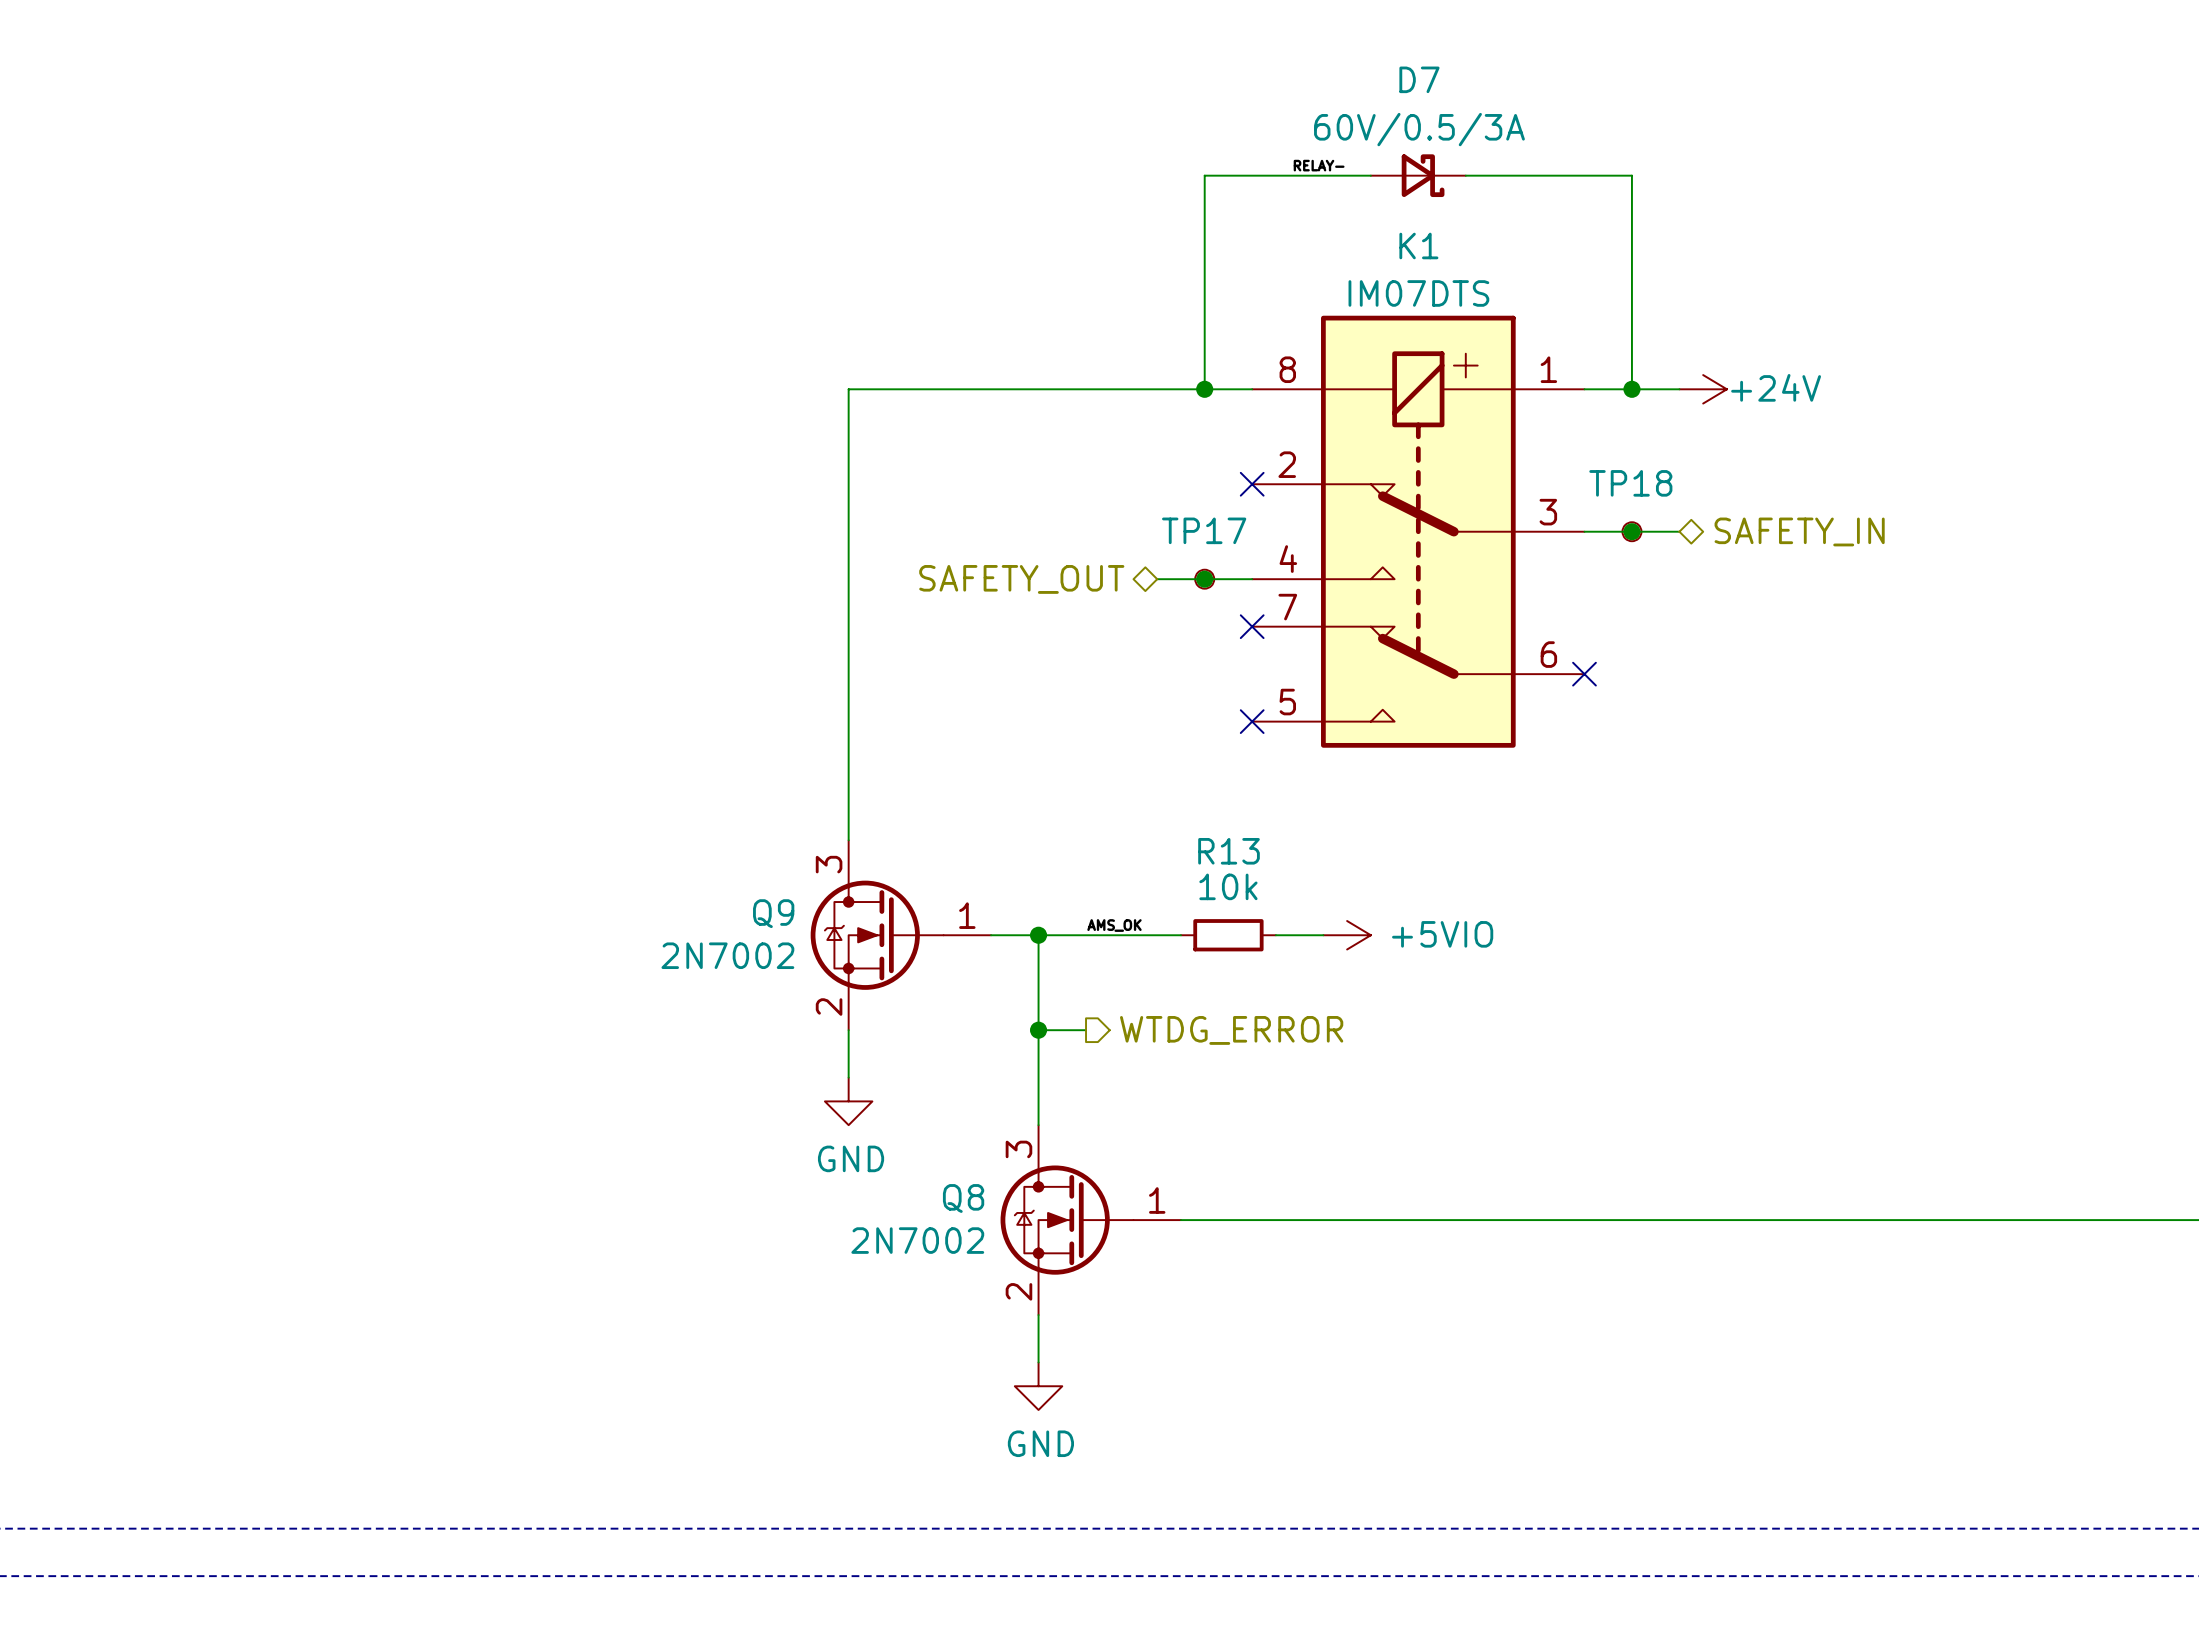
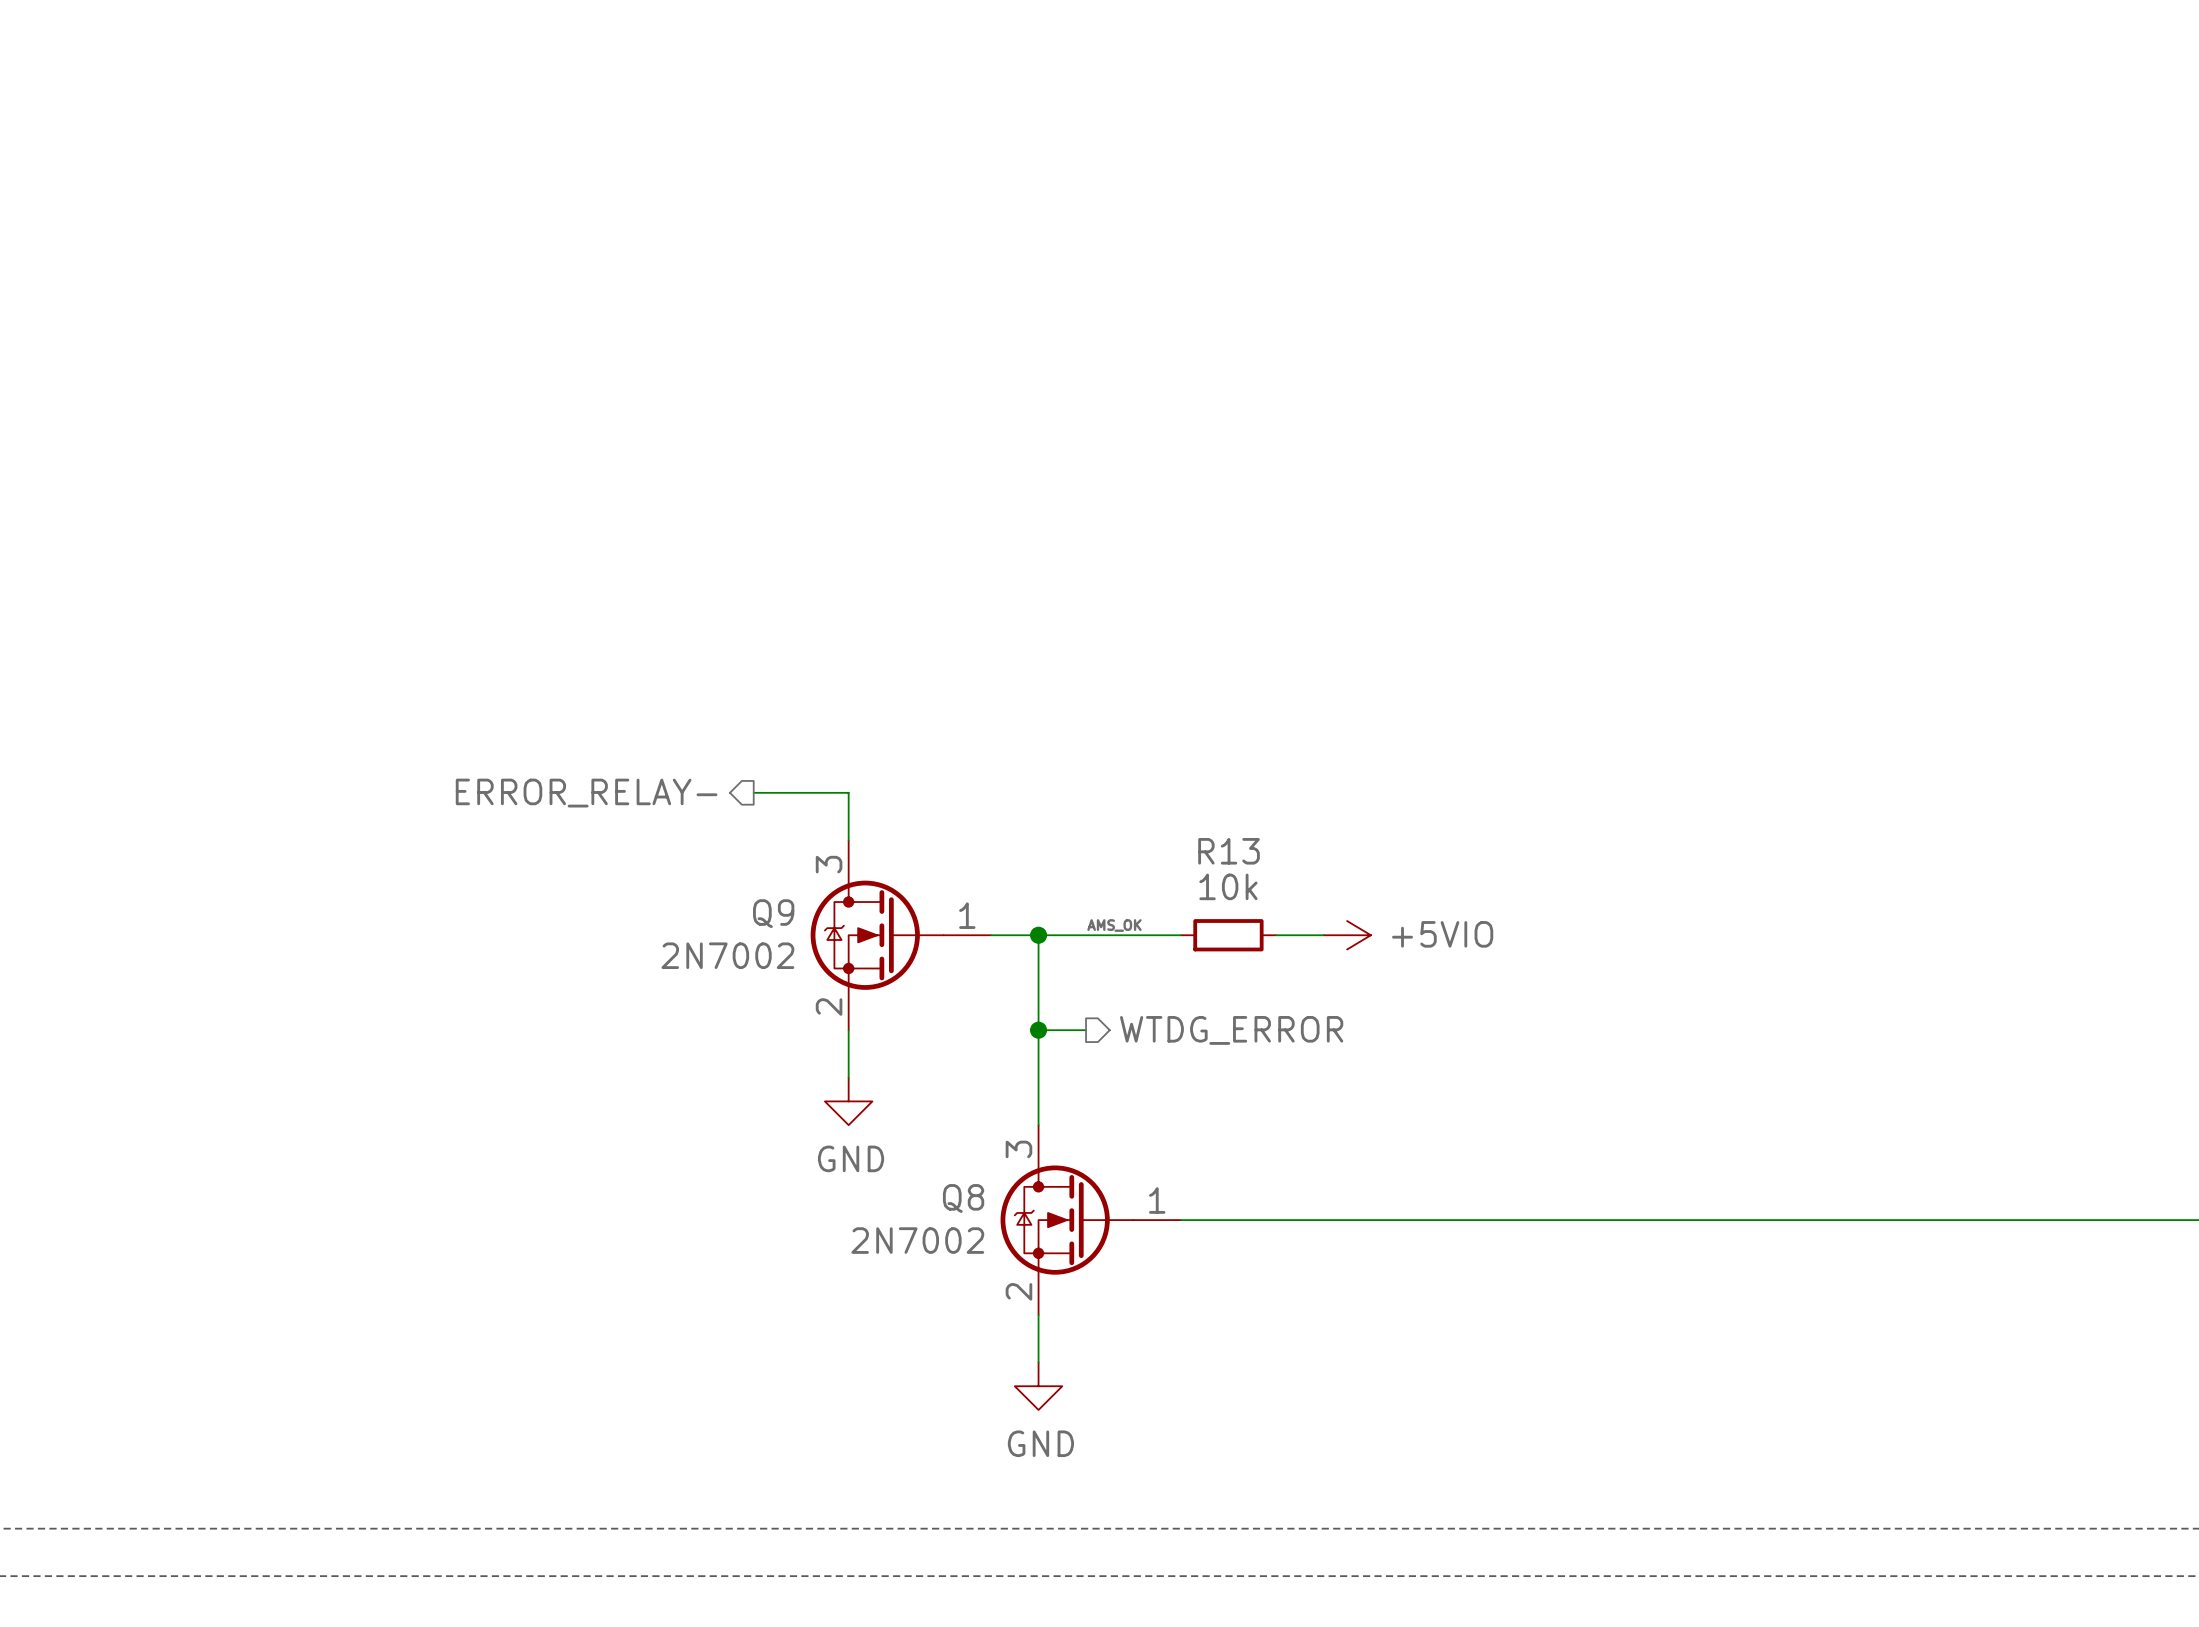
label: RELAY- (1319, 165) -> none
wire: (1370, 175) (1204, 175) (1204, 389) -> none
D7: 60V/0.5/3A (1418, 175) -> none
wire: (1465, 175) (1631, 175) (1631, 389) -> none
junction: (1204, 389) -> none
wire: (1252, 389) (848, 389) (848, 792) -> (753, 792) (848, 792)
wire: (1584, 389) (1679, 389) -> none
junction: (1631, 389) -> none
power symbol: +24V (1703, 389) -> none
no-connect mark: (1252, 484) -> none
K1: IM07DTS (1418, 531) -> none
wire: (1584, 531) (1679, 531) -> none
junction: (1631, 531) -> none
TP18: (1631, 531) -> none
hierarchical label: SAFETY_IN (1799, 531) -> none
hierarchical label: SAFETY_OUT (1021, 579) -> none
wire: (1157, 579) (1252, 579) -> none
junction: (1204, 579) -> none
TP17: (1204, 579) -> none
no-connect mark: (1252, 626) -> none
no-connect mark: (1584, 674) -> none
no-connect mark: (1252, 721) -> none
hierarchical label: none -> ERROR_RELAY- (586, 793)

